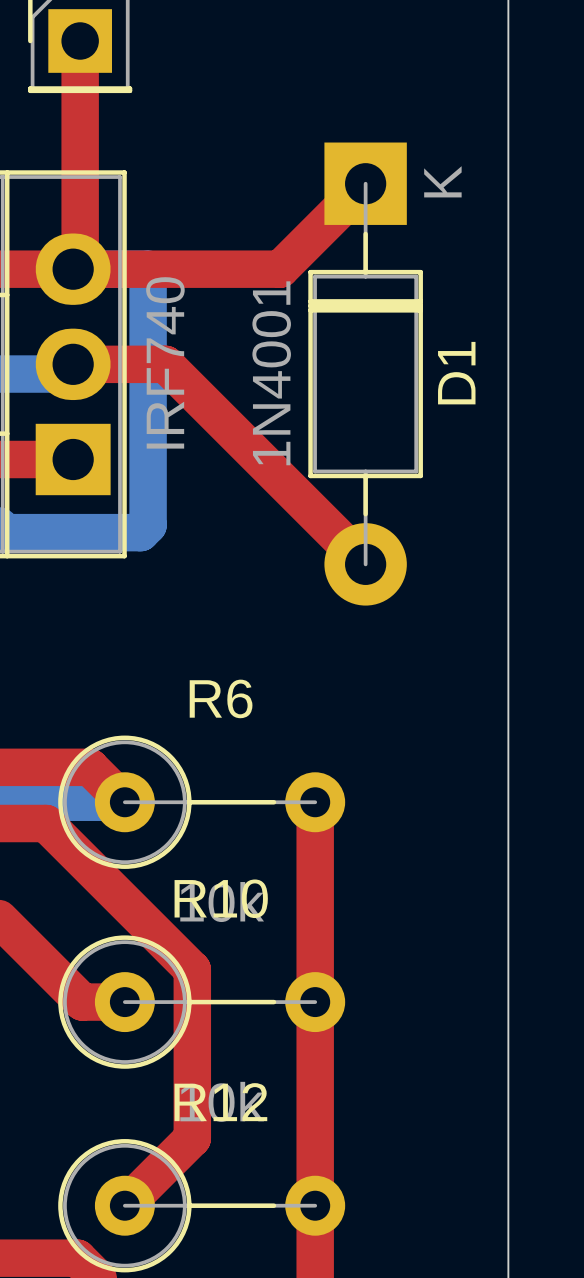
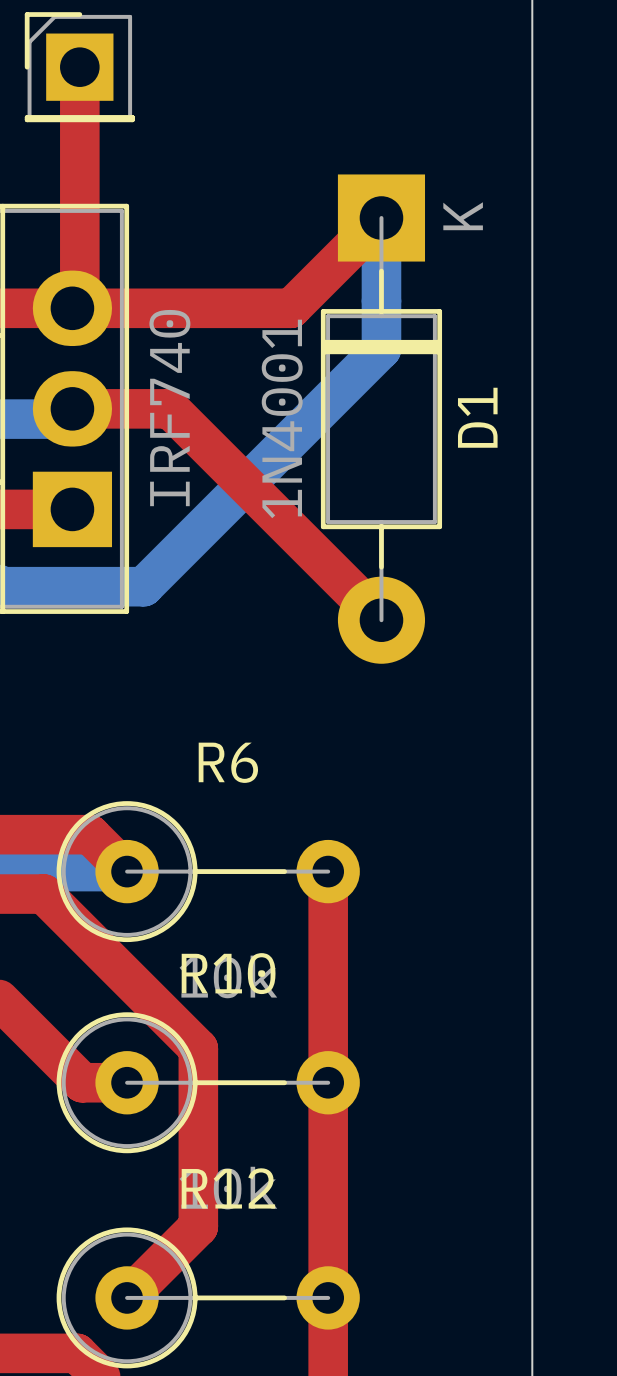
bottom track: (73, 269) (148, 269) (148, 525) -> (381, 218) (381, 348) (151, 578)

